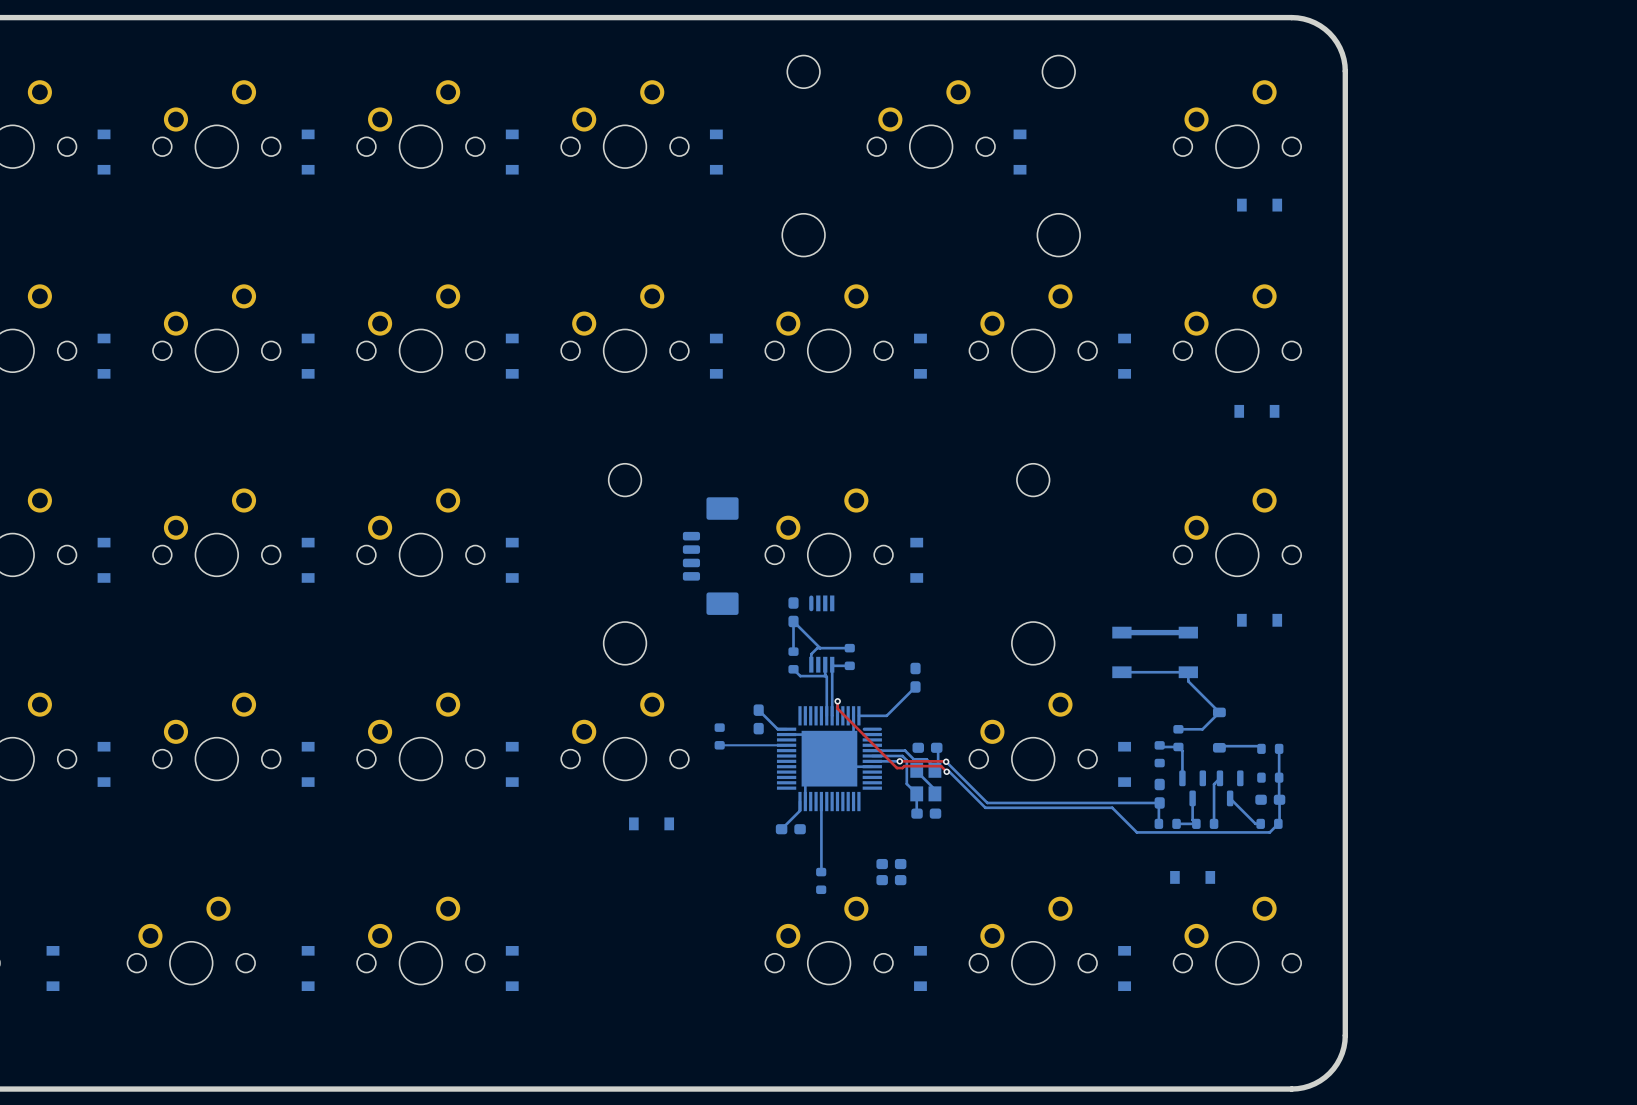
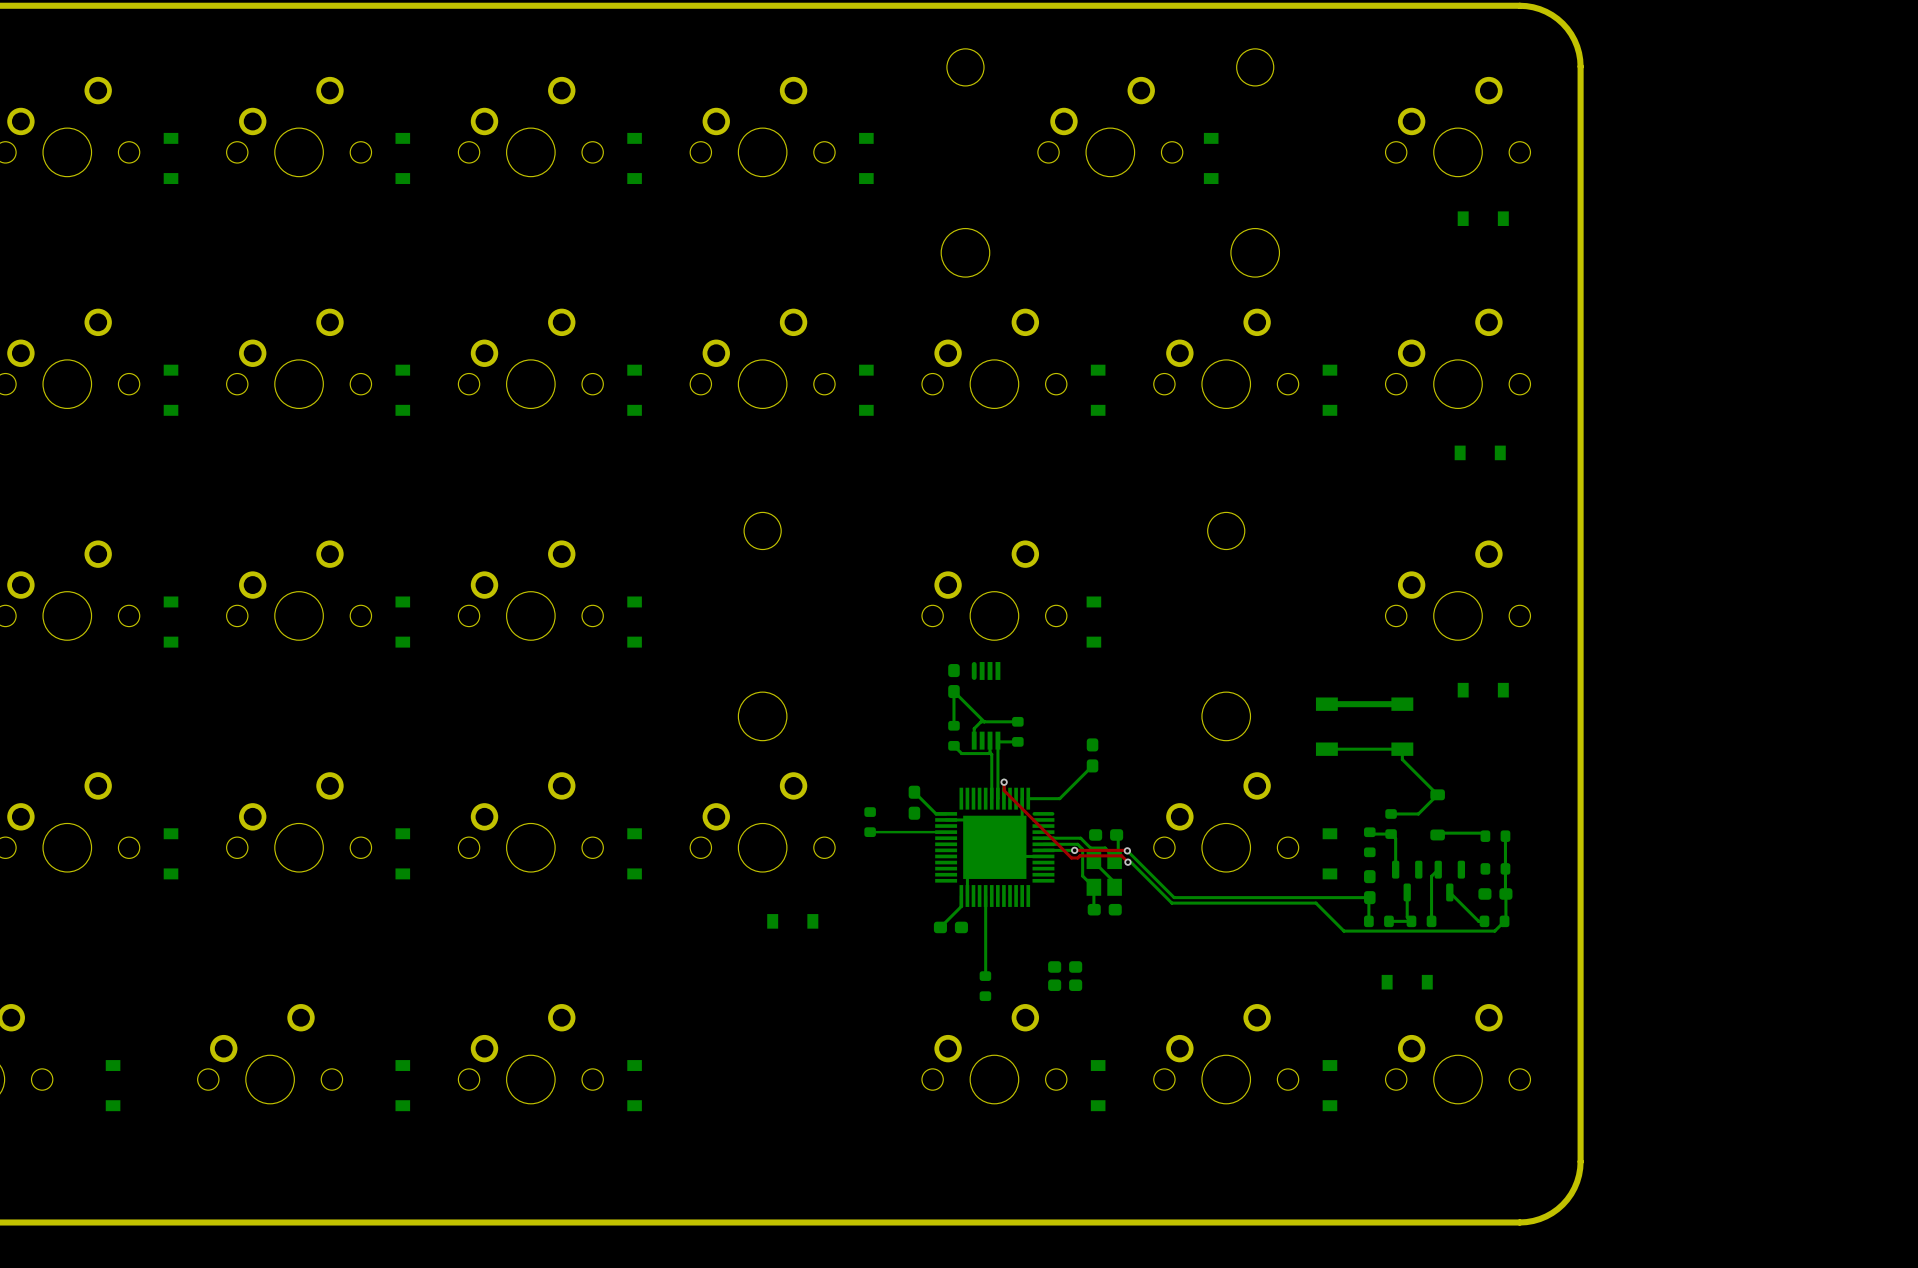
part: (710, 556) -> none

